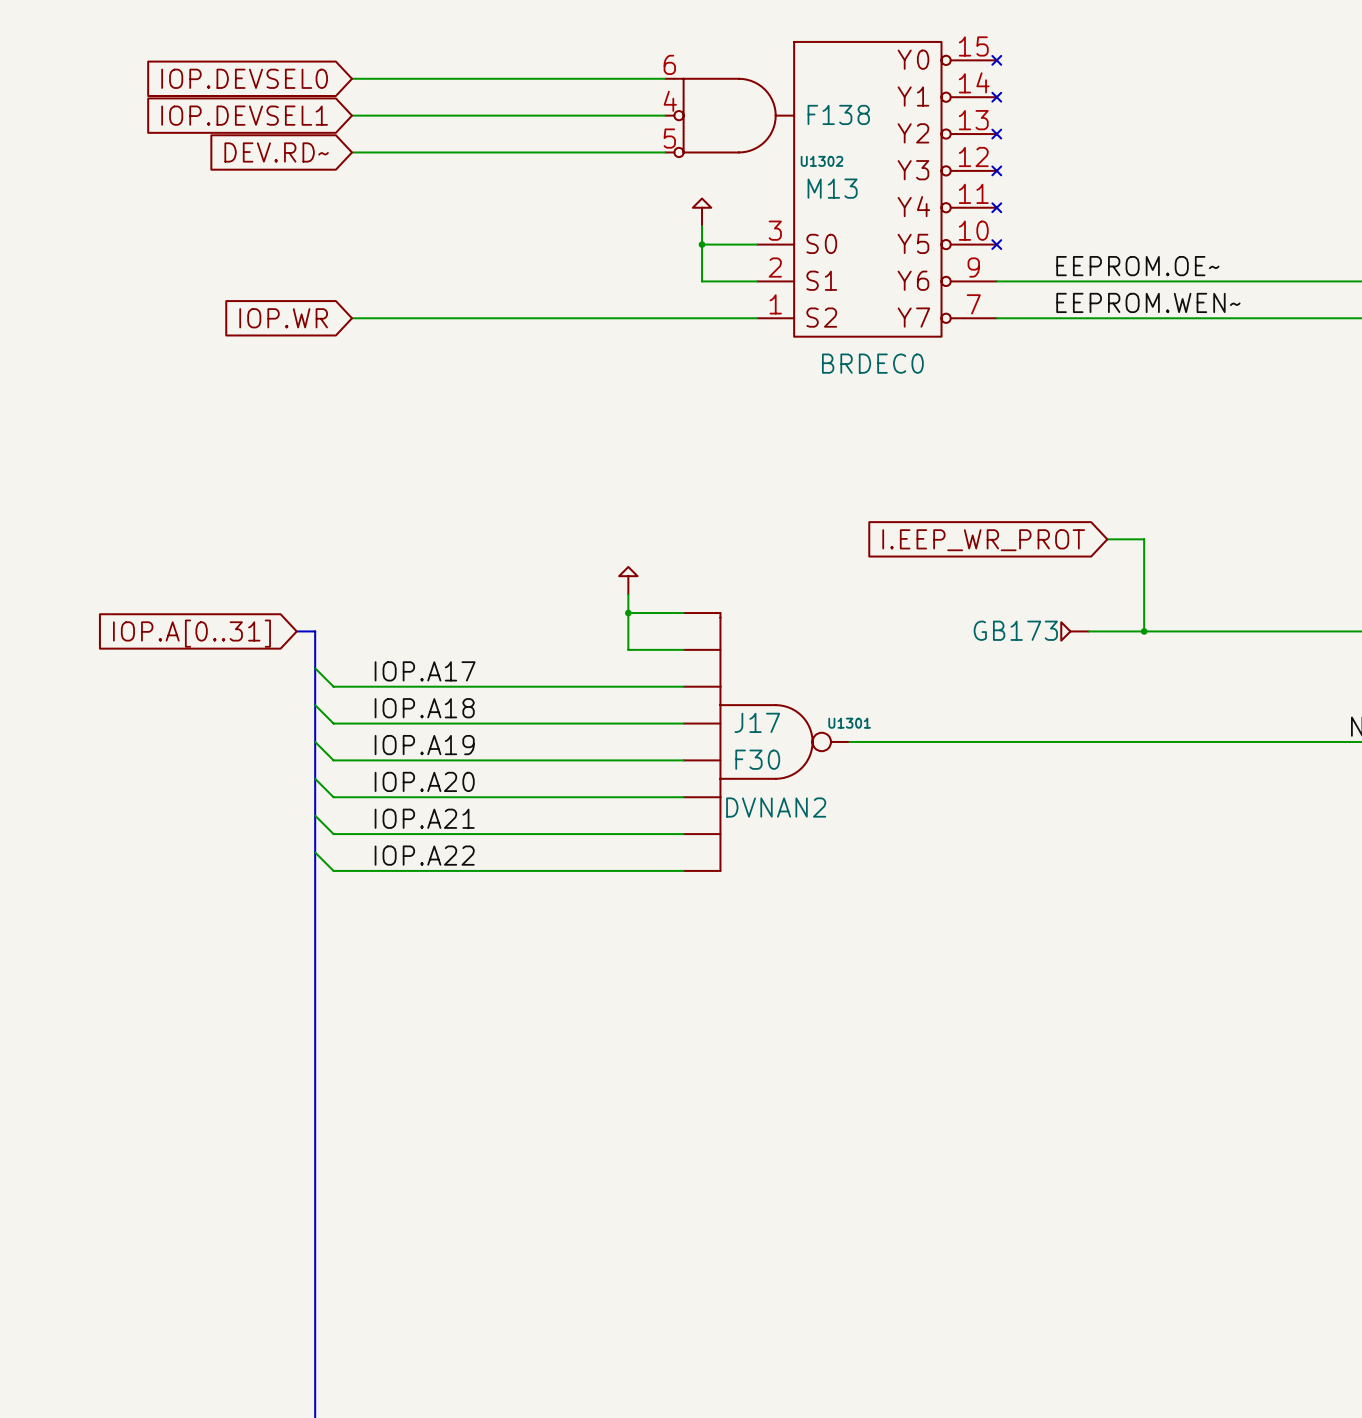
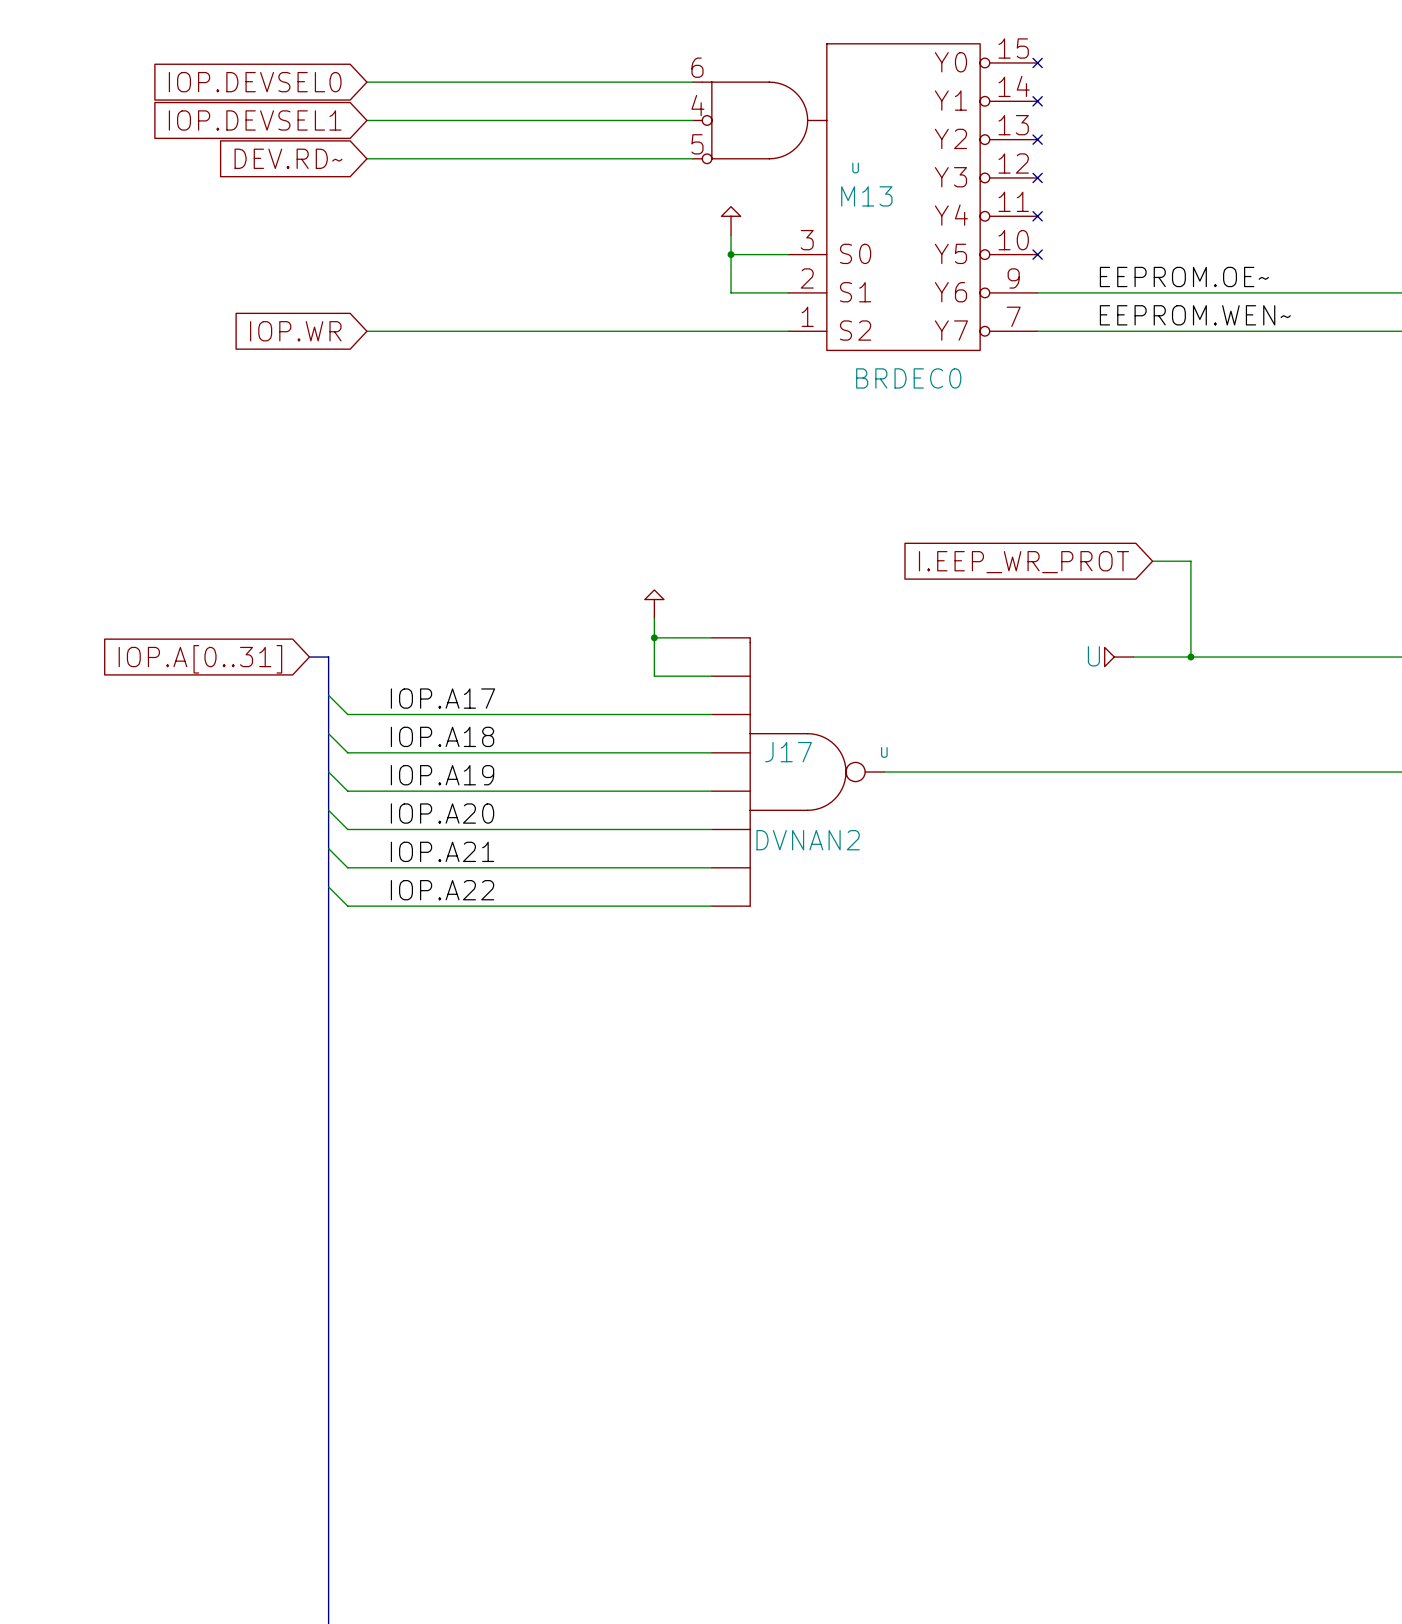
U1302 value: F138 (838, 114) -> none
U1302 name: U1302 (821, 161) -> U (855, 168)
GB173 name: GB173 (1015, 630) -> U (1093, 656)
U1301 name: U1301 (849, 723) -> U (884, 752)
U1301 value: F30 (757, 759) -> none

